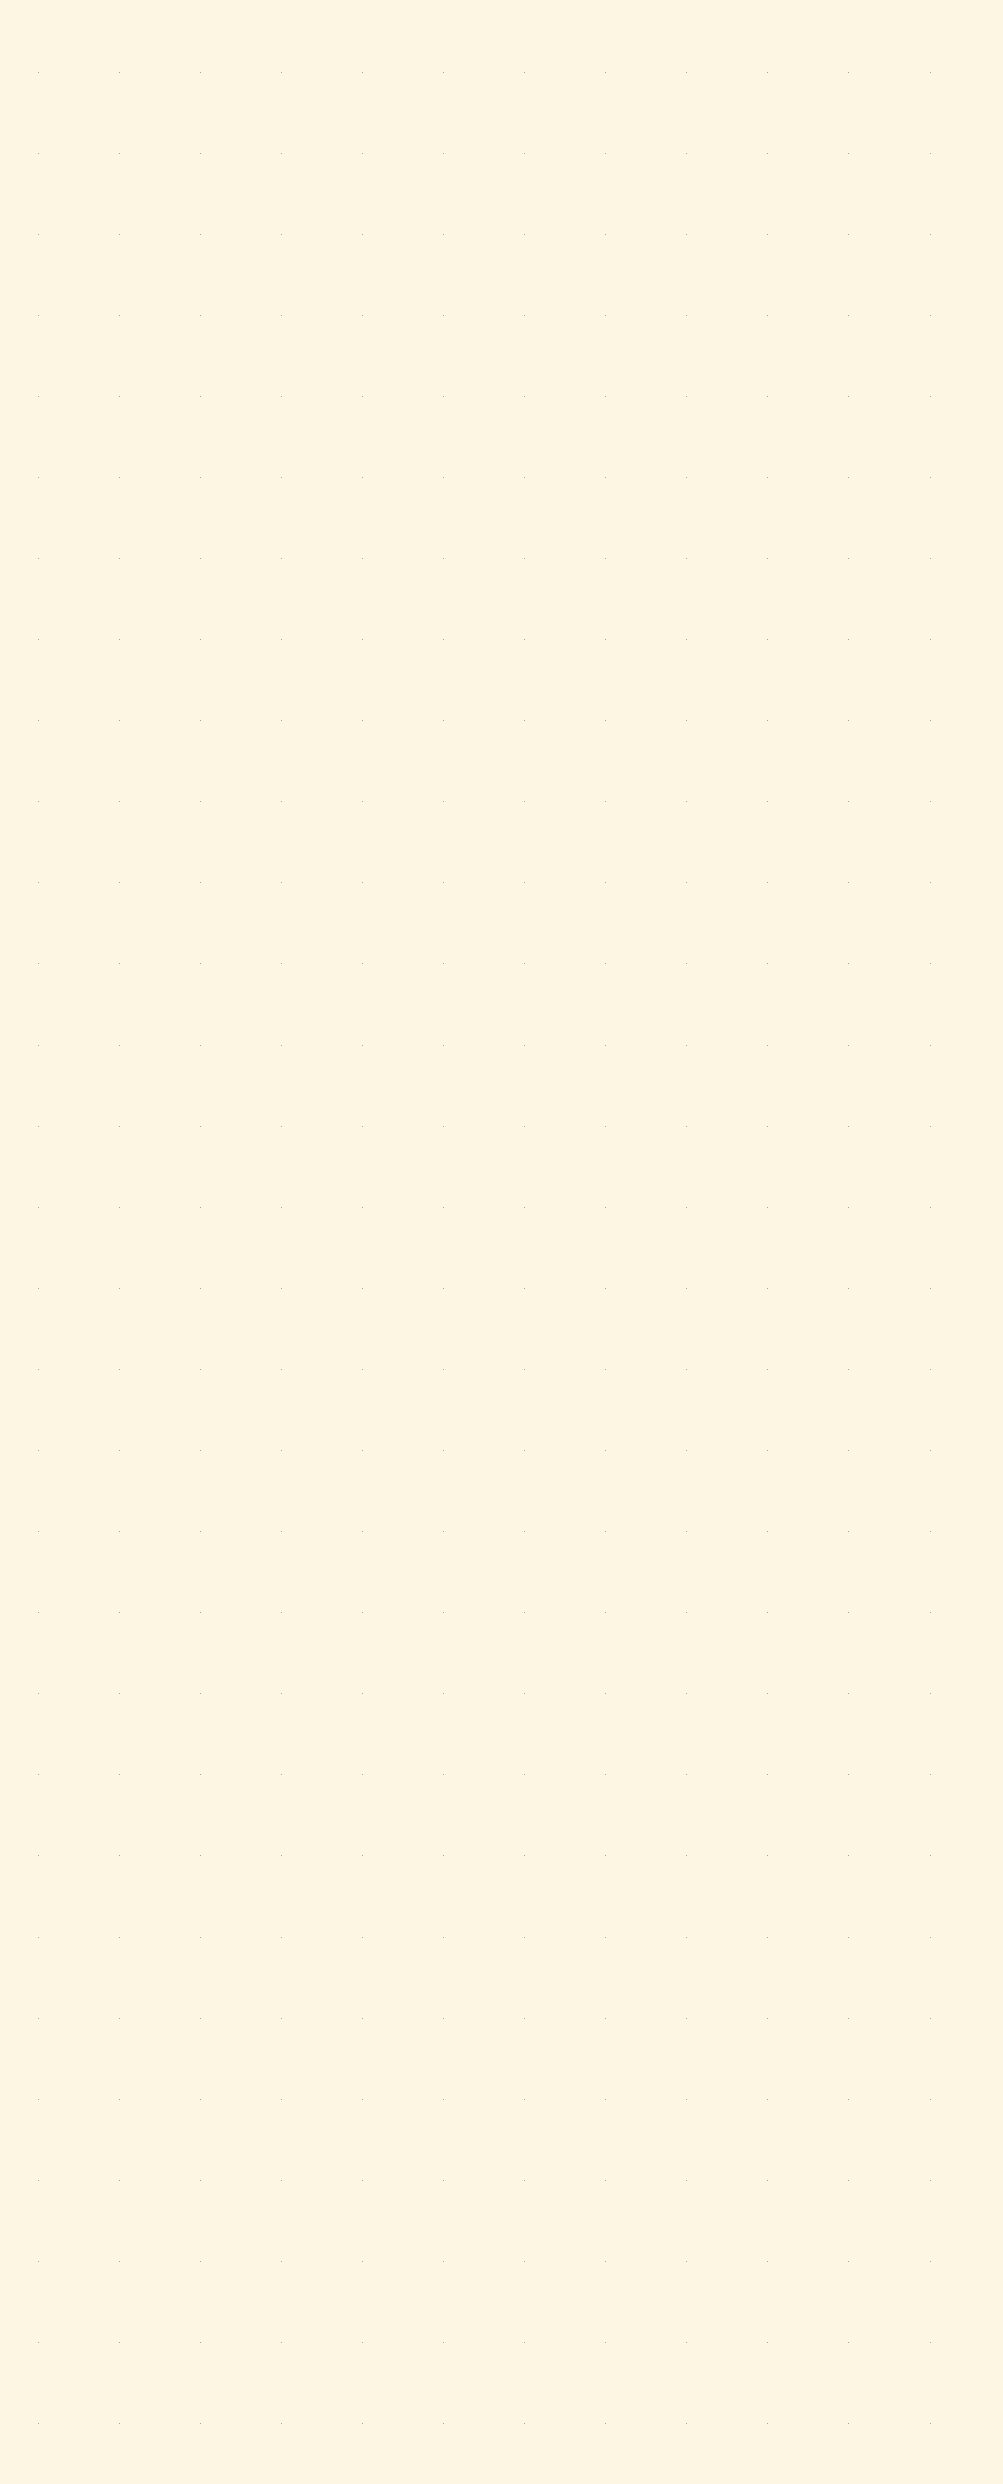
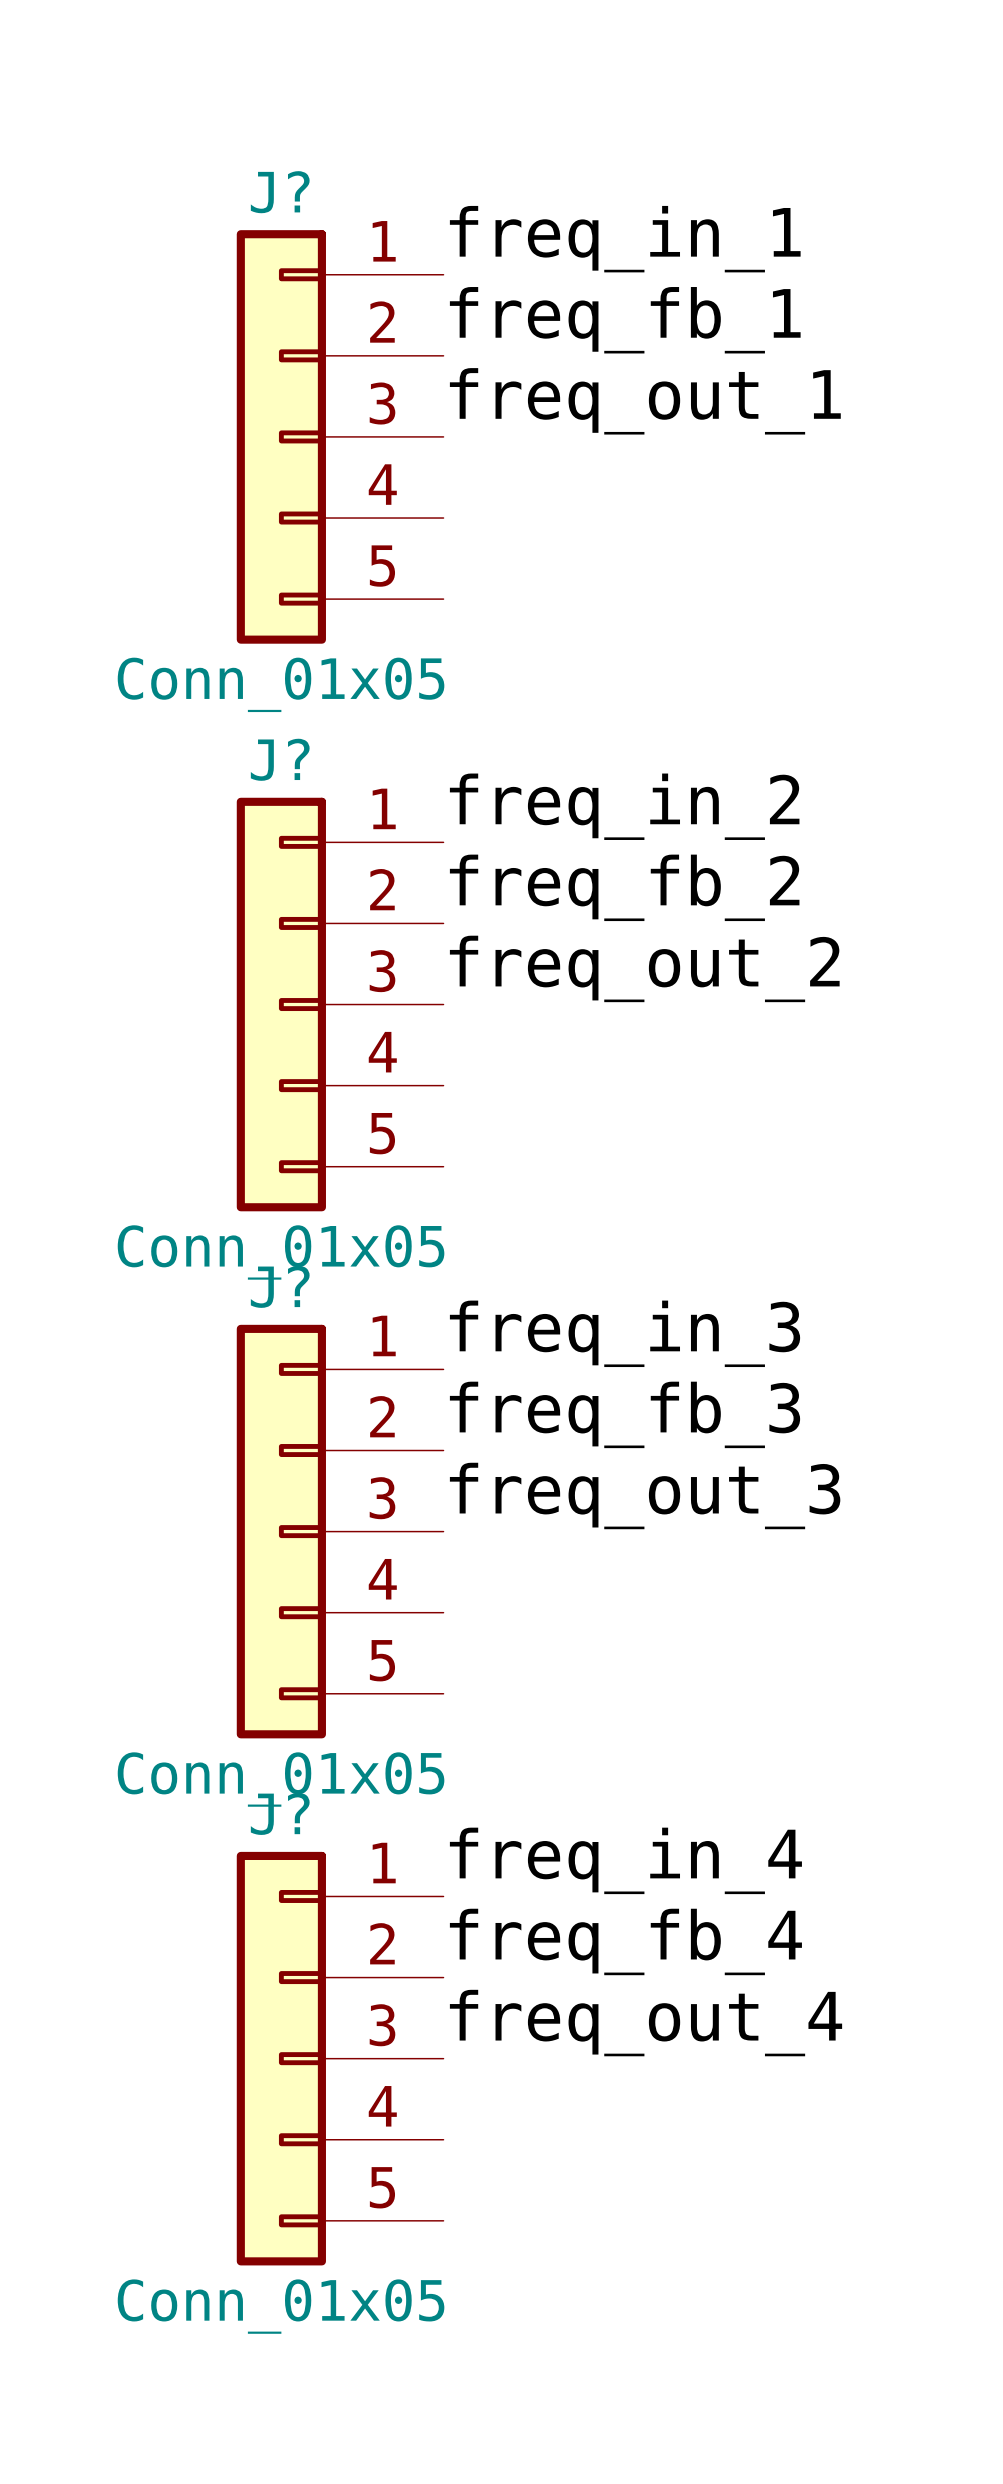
label: none -> freq_in_1 (625, 239)
label: none -> freq_fb_1 (625, 320)
label: none -> freq_out_1 (645, 401)
J?: none -> Conn_01x05 (340, 436)
label: none -> freq_in_2 (624, 806)
label: none -> freq_fb_2 (624, 887)
label: none -> freq_out_2 (644, 968)
J?: none -> Conn_01x05 (340, 1004)
label: none -> freq_in_3 (625, 1333)
label: none -> freq_fb_3 (625, 1414)
label: none -> freq_out_3 (645, 1495)
J?: none -> Conn_01x05 (340, 1531)
label: none -> freq_in_4 (625, 1860)
label: none -> freq_fb_4 (625, 1941)
label: none -> freq_out_4 (646, 2023)
J?: none -> Conn_01x05 (340, 2058)

